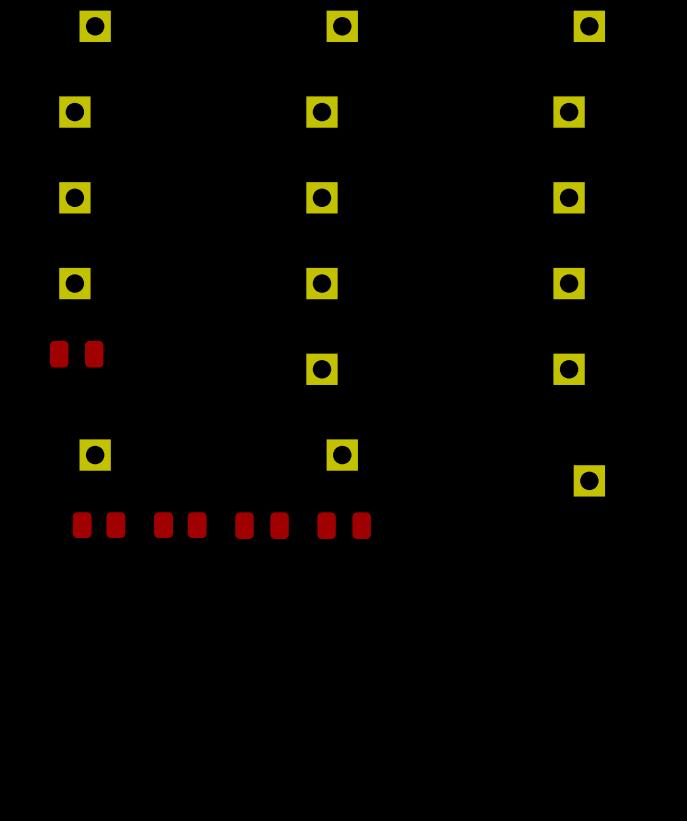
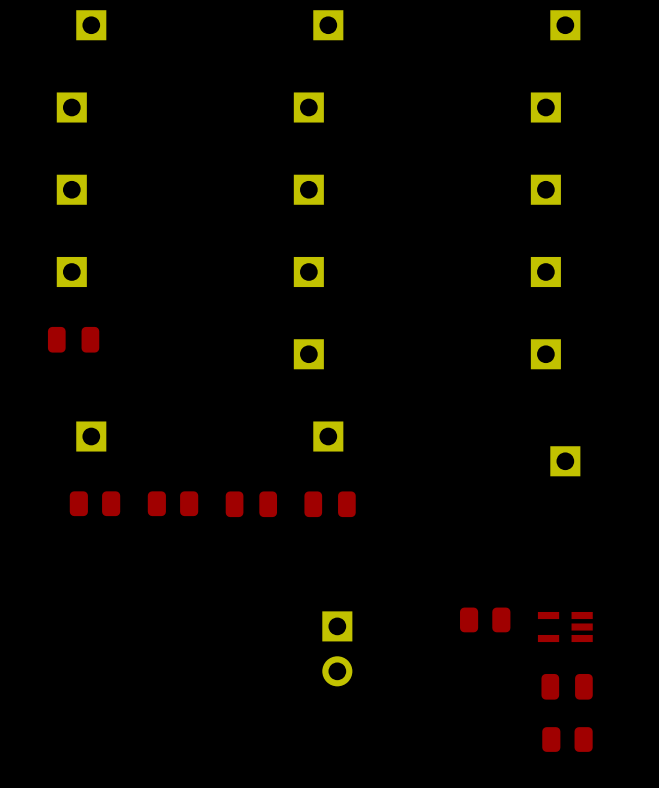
part: none -> (485, 619)
part: none -> (565, 627)
part: none -> (337, 648)
part: none -> (567, 686)
part: none -> (567, 739)

